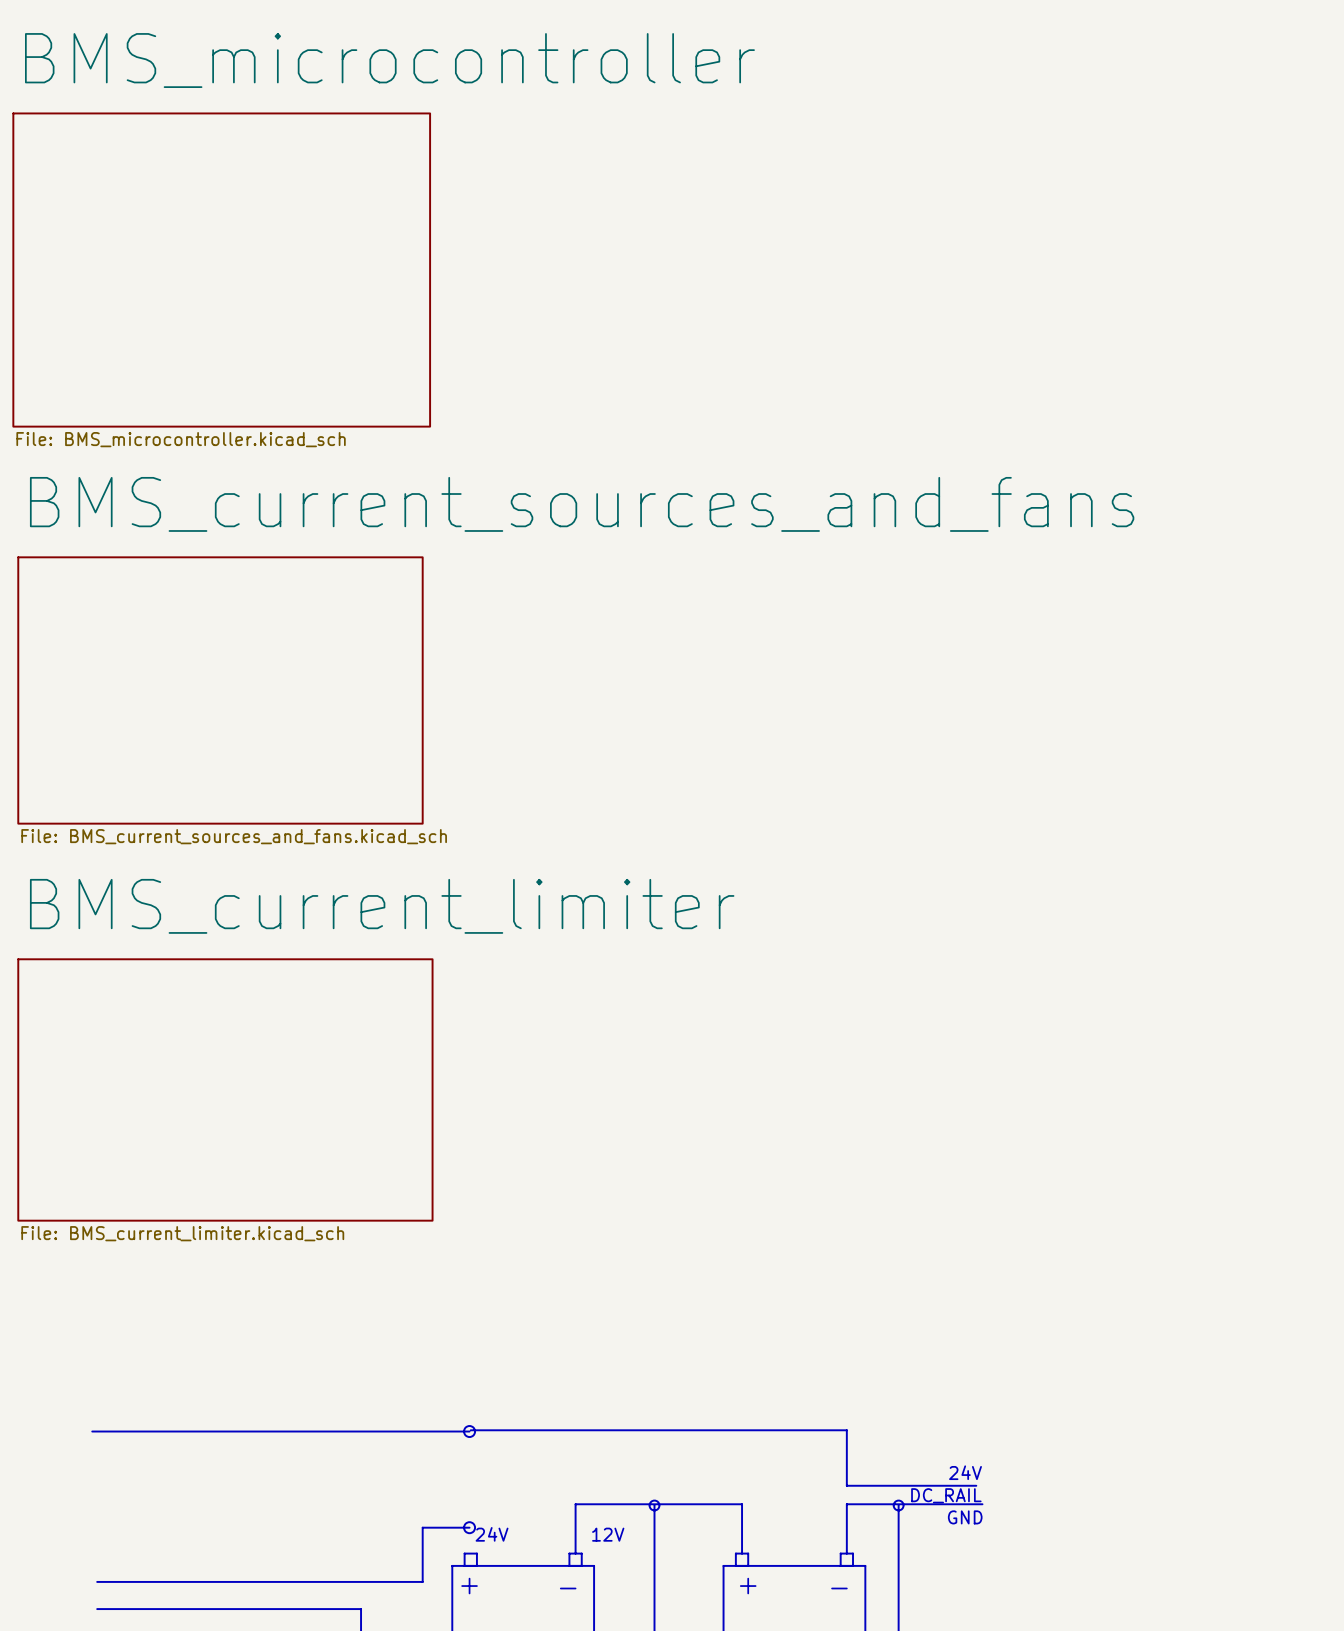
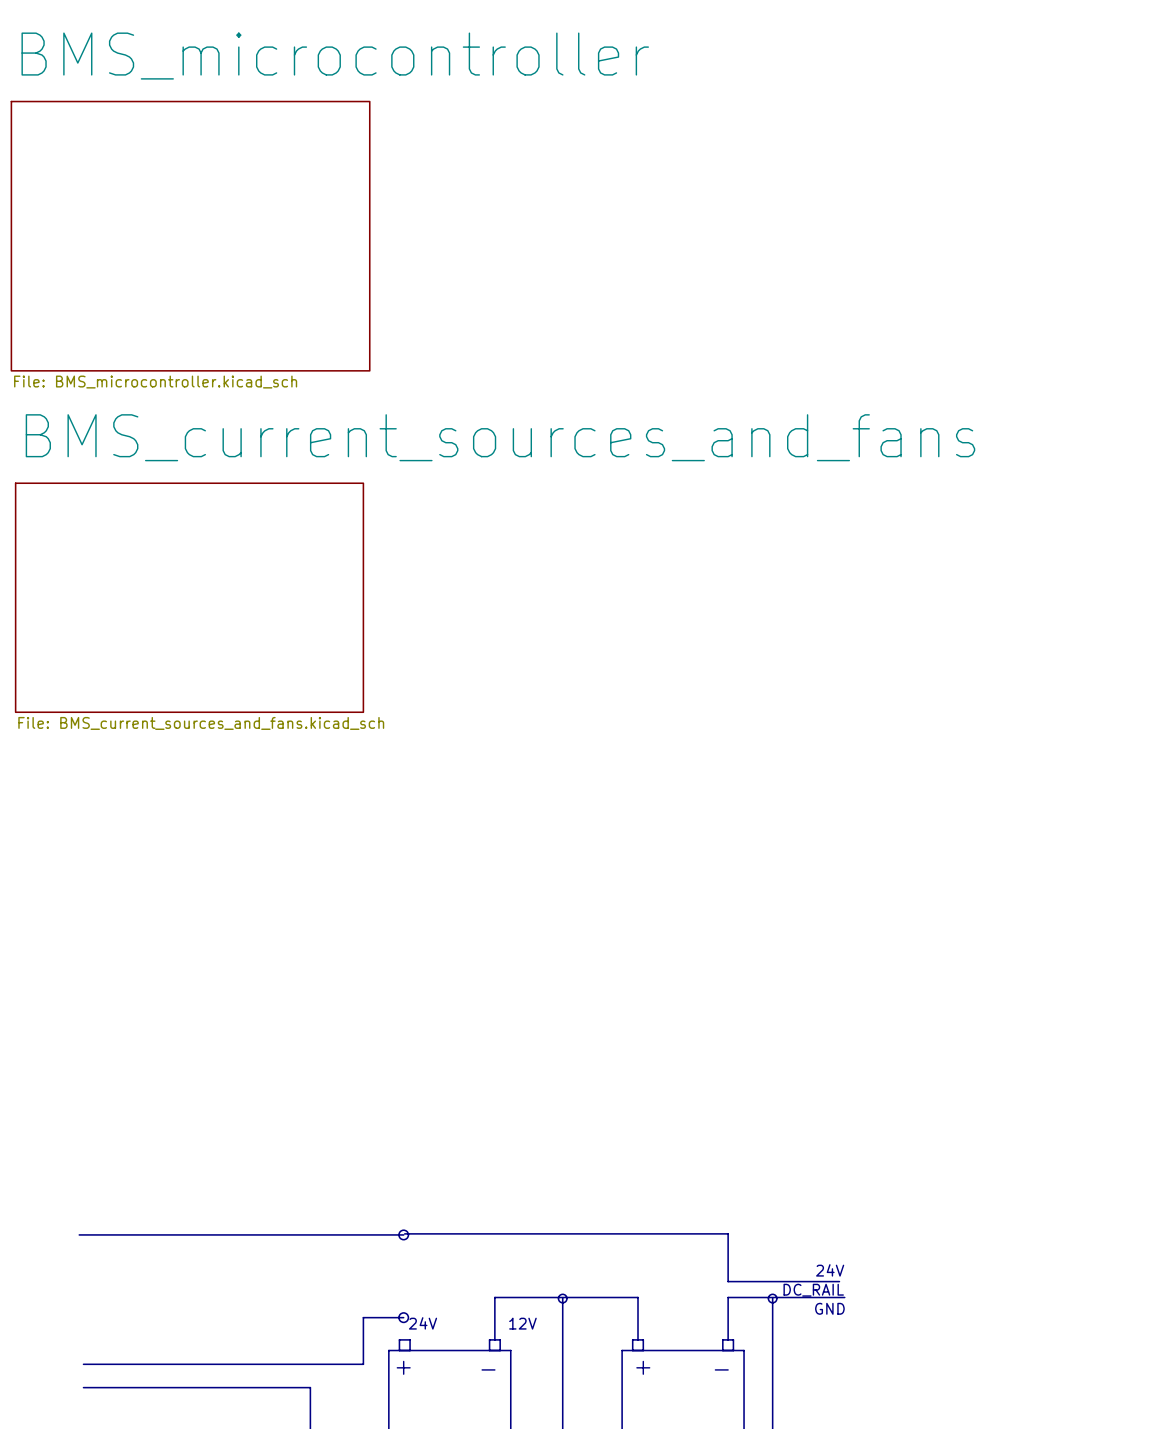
sheet BMS_current_limiter: File: BMS_current_limiter.kicad_sch (225, 1089) -> none

